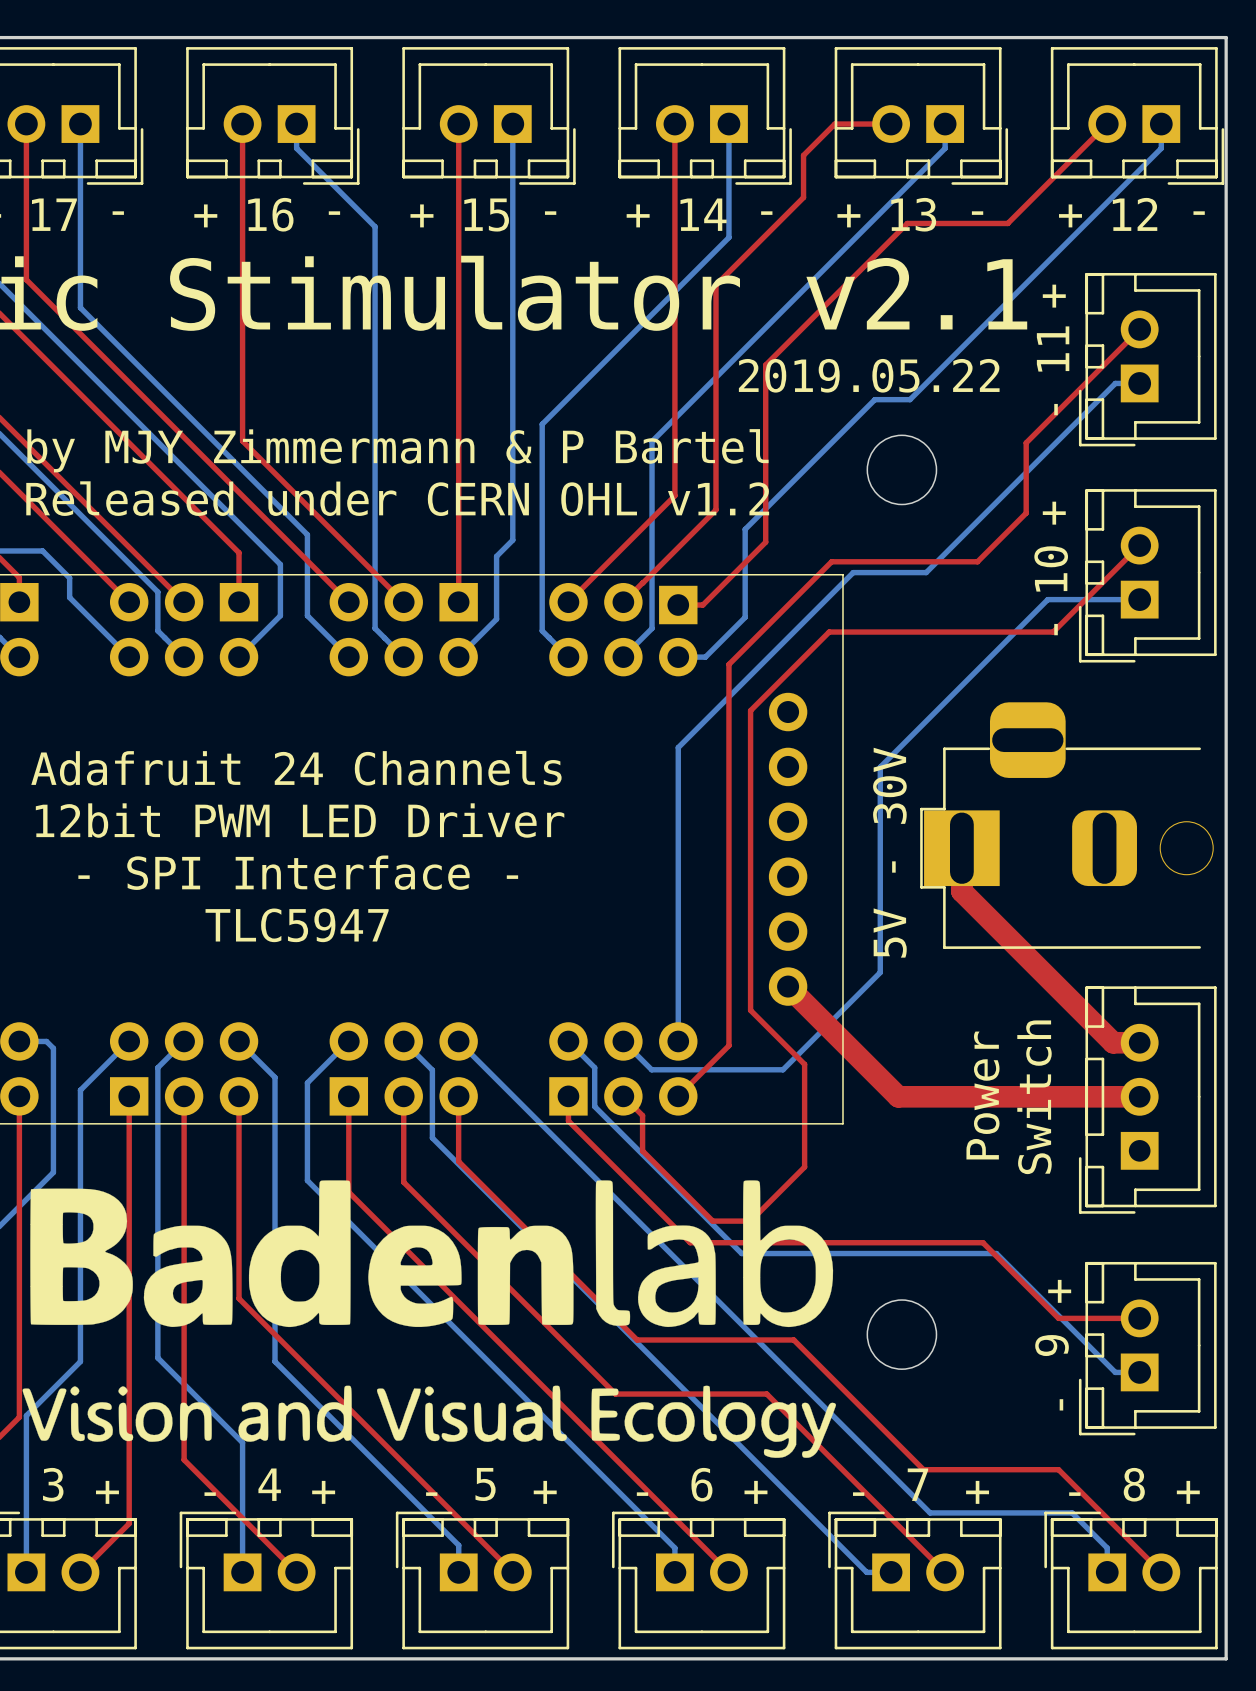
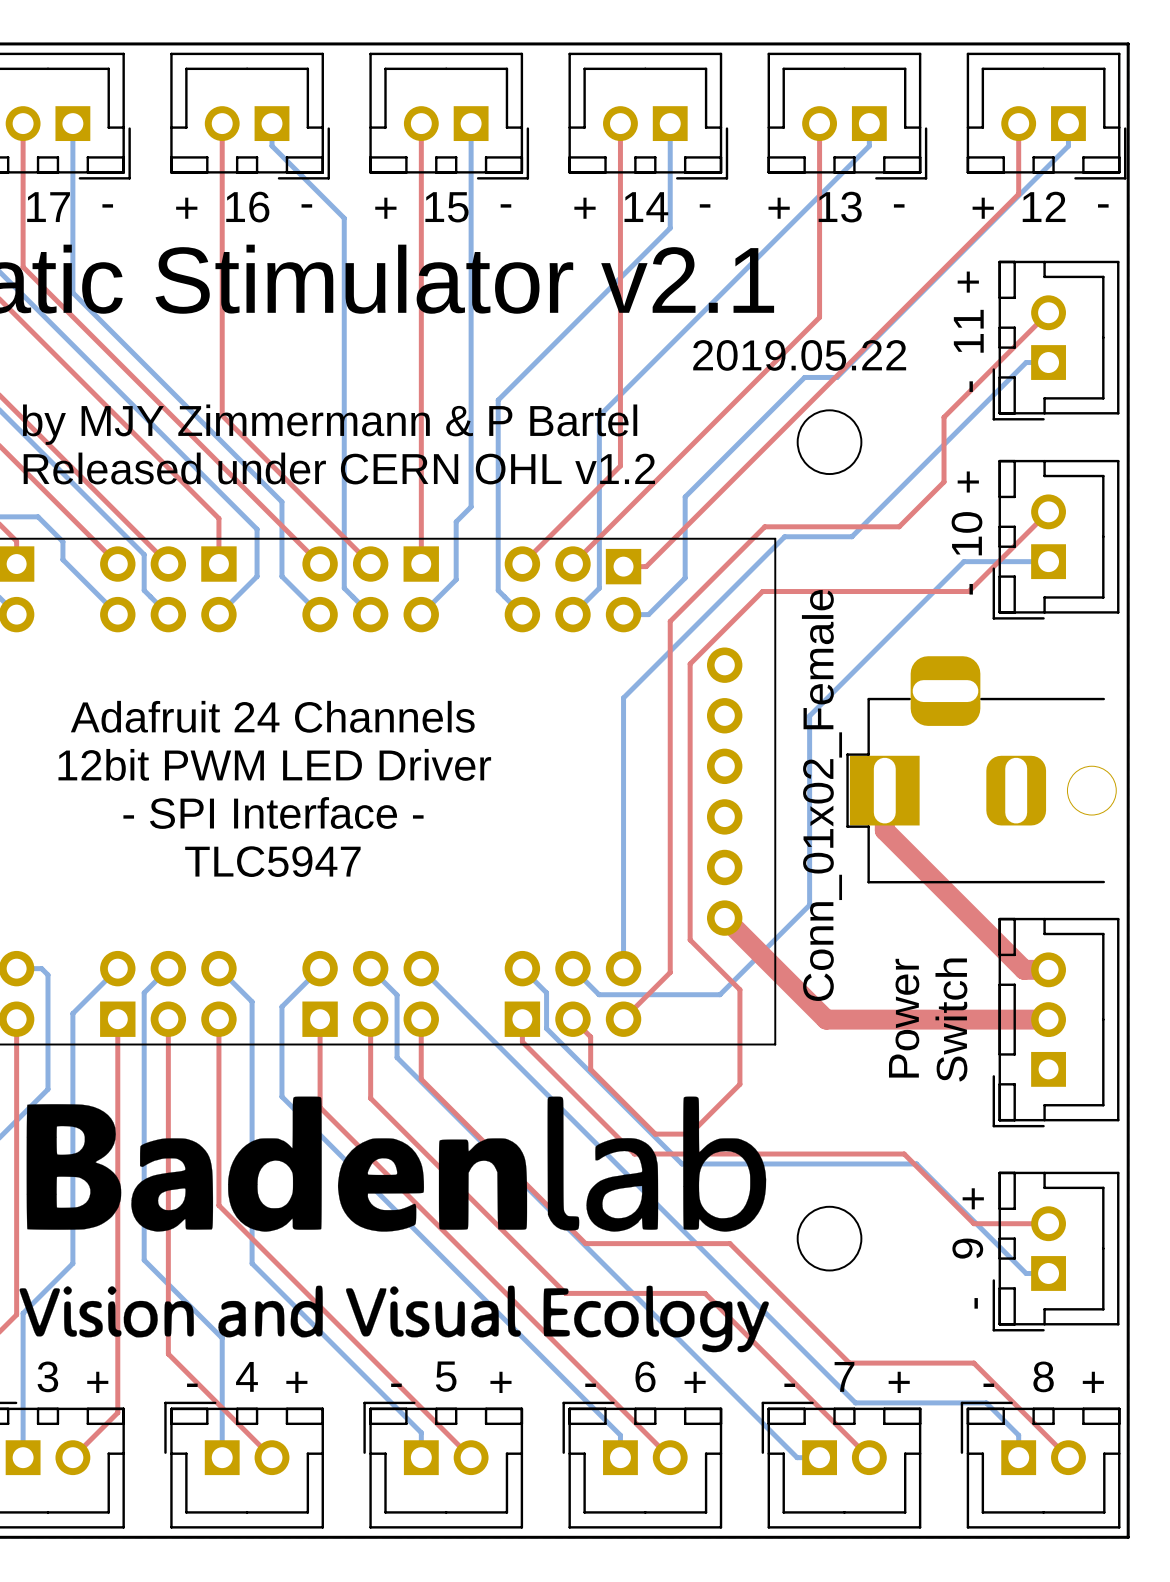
top track: (891, 124) (834, 124) (803, 155) (803, 197) (715, 285) (715, 509) (642, 582) -> (819, 123) (819, 317) (590, 546)
top track: (1107, 124) (1007, 223) (907, 223) (765, 365) (765, 542) -> (1018, 123) (1018, 194) (704, 508)
part value: 5V - 30V (889, 852) -> Conn_01x02_Female (821, 795)

